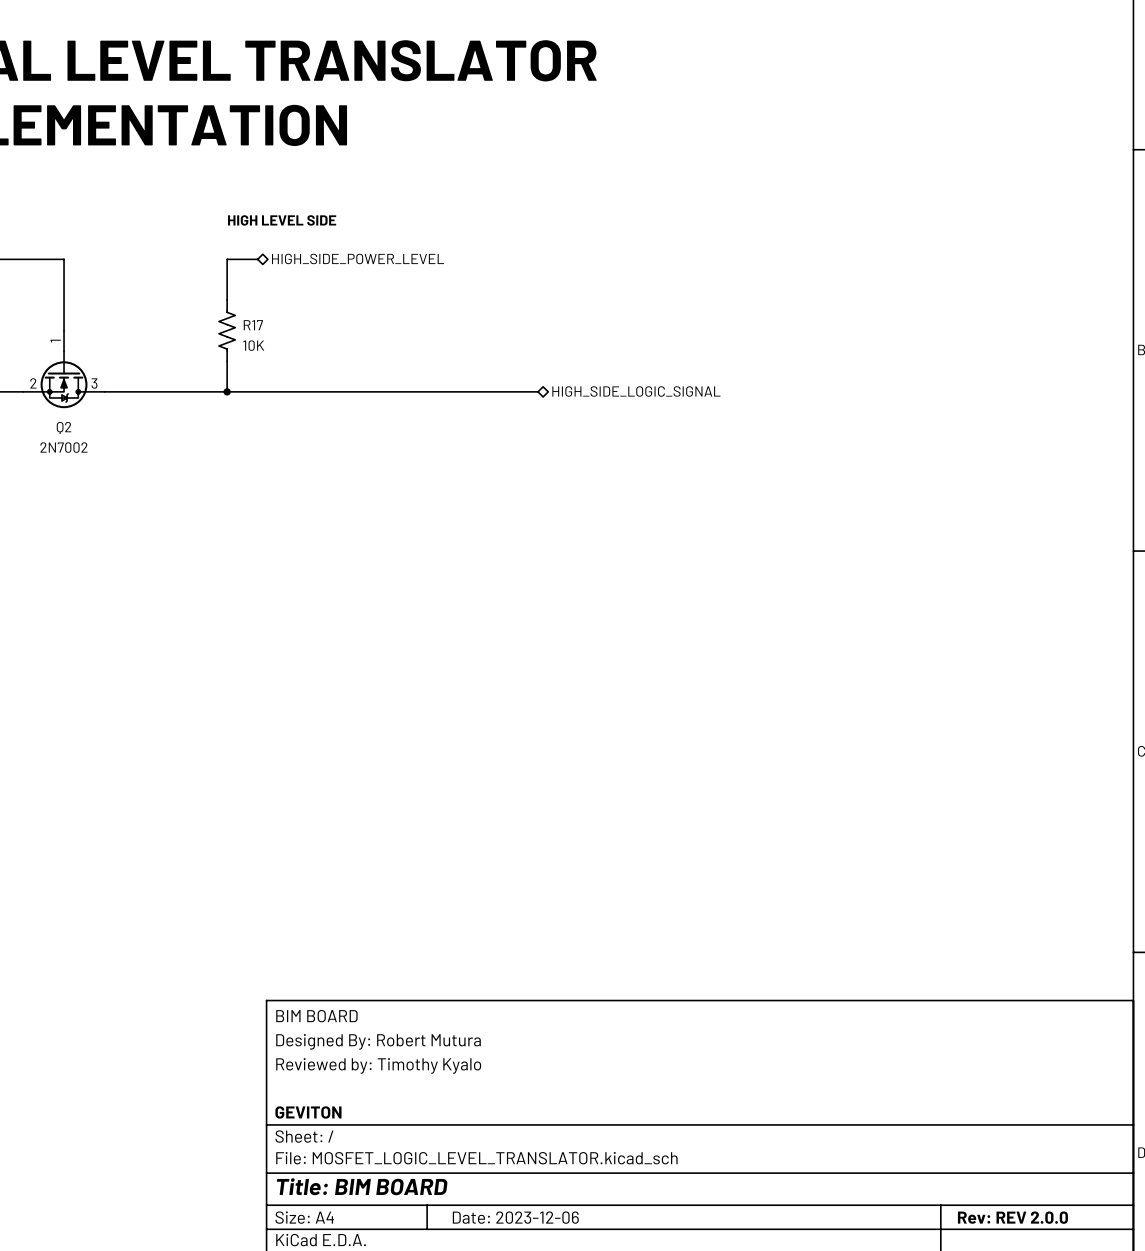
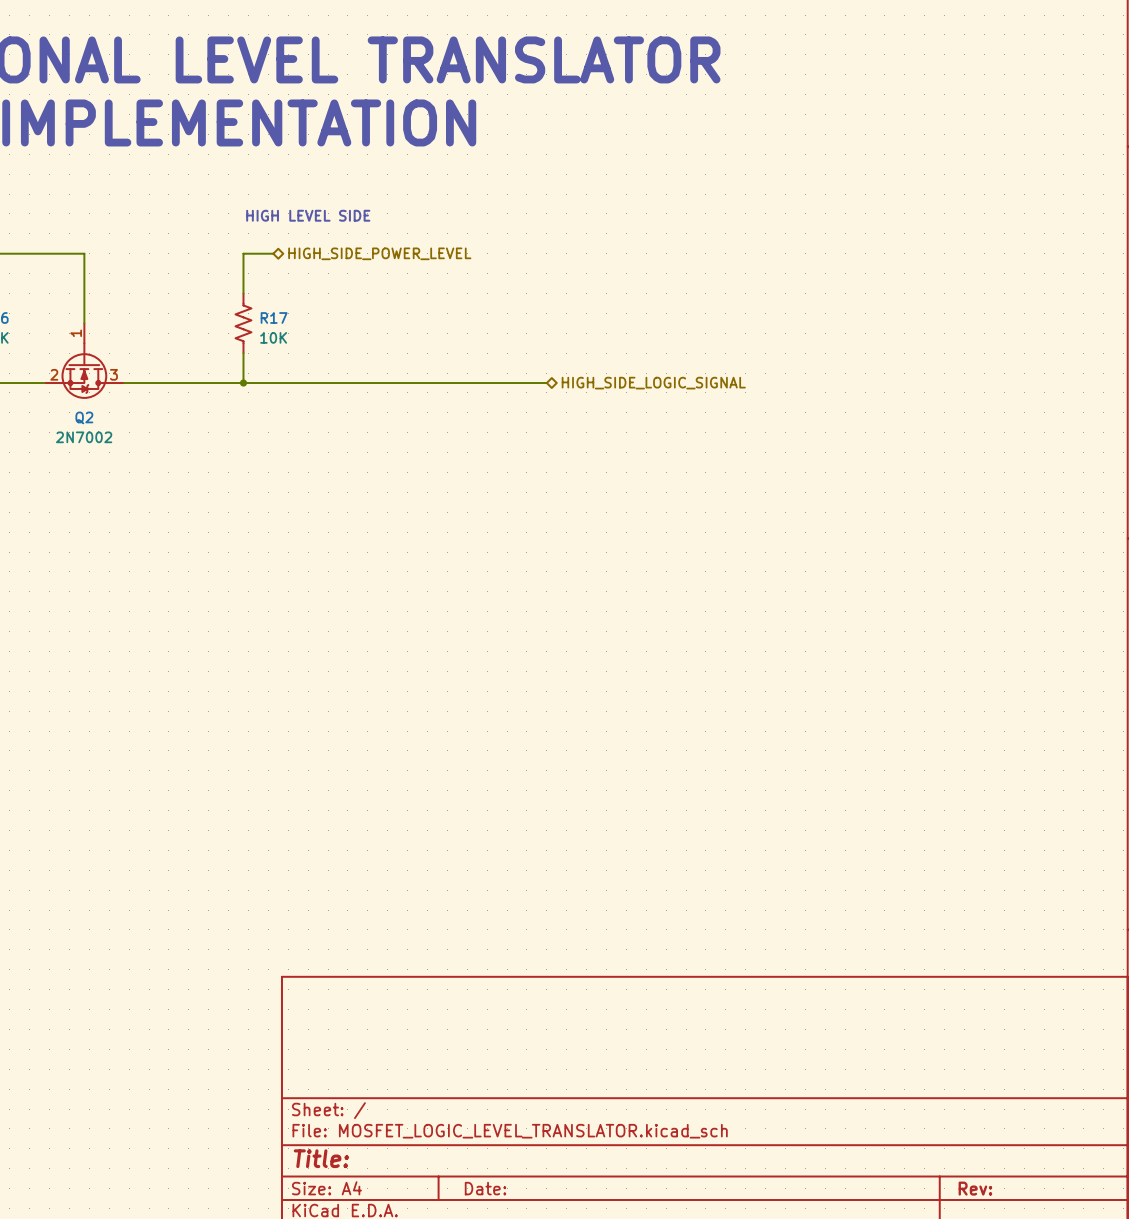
title block: BIM BOARD (316, 1016) -> none
title block: Designed By: Robert Mutura (378, 1041) -> none
title block: Reviewed by: Timothy Kyalo (378, 1065) -> none
title block: GEVITON (308, 1112) -> none
title block: Title: BIM BOARD (362, 1186) -> Title: (321, 1158)
title block: Date: 2023-12-06 (515, 1217) -> Date: (485, 1188)
title block: Rev: REV 2.0.0 (1012, 1217) -> Rev: (975, 1188)

